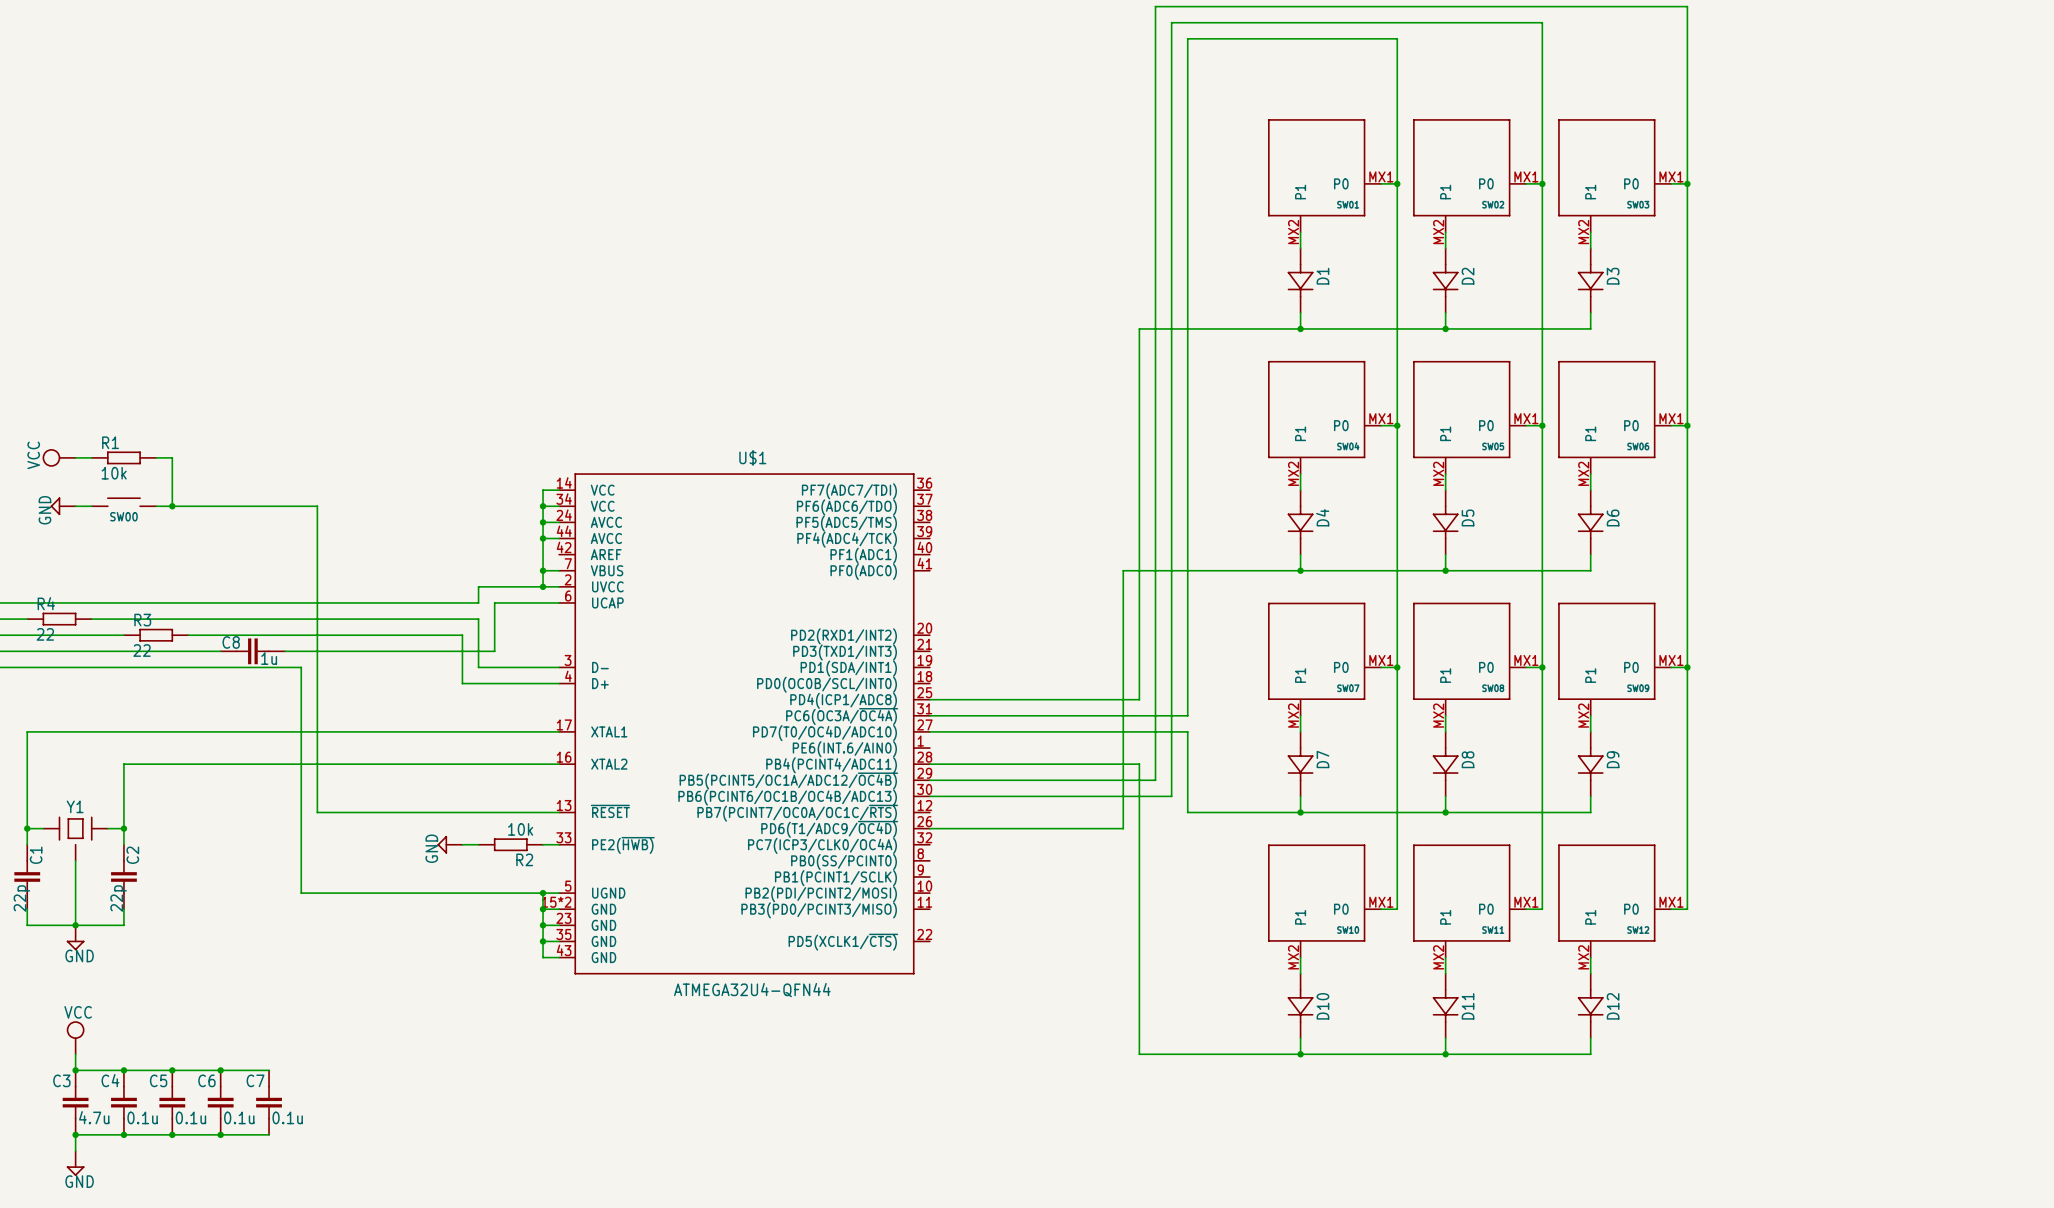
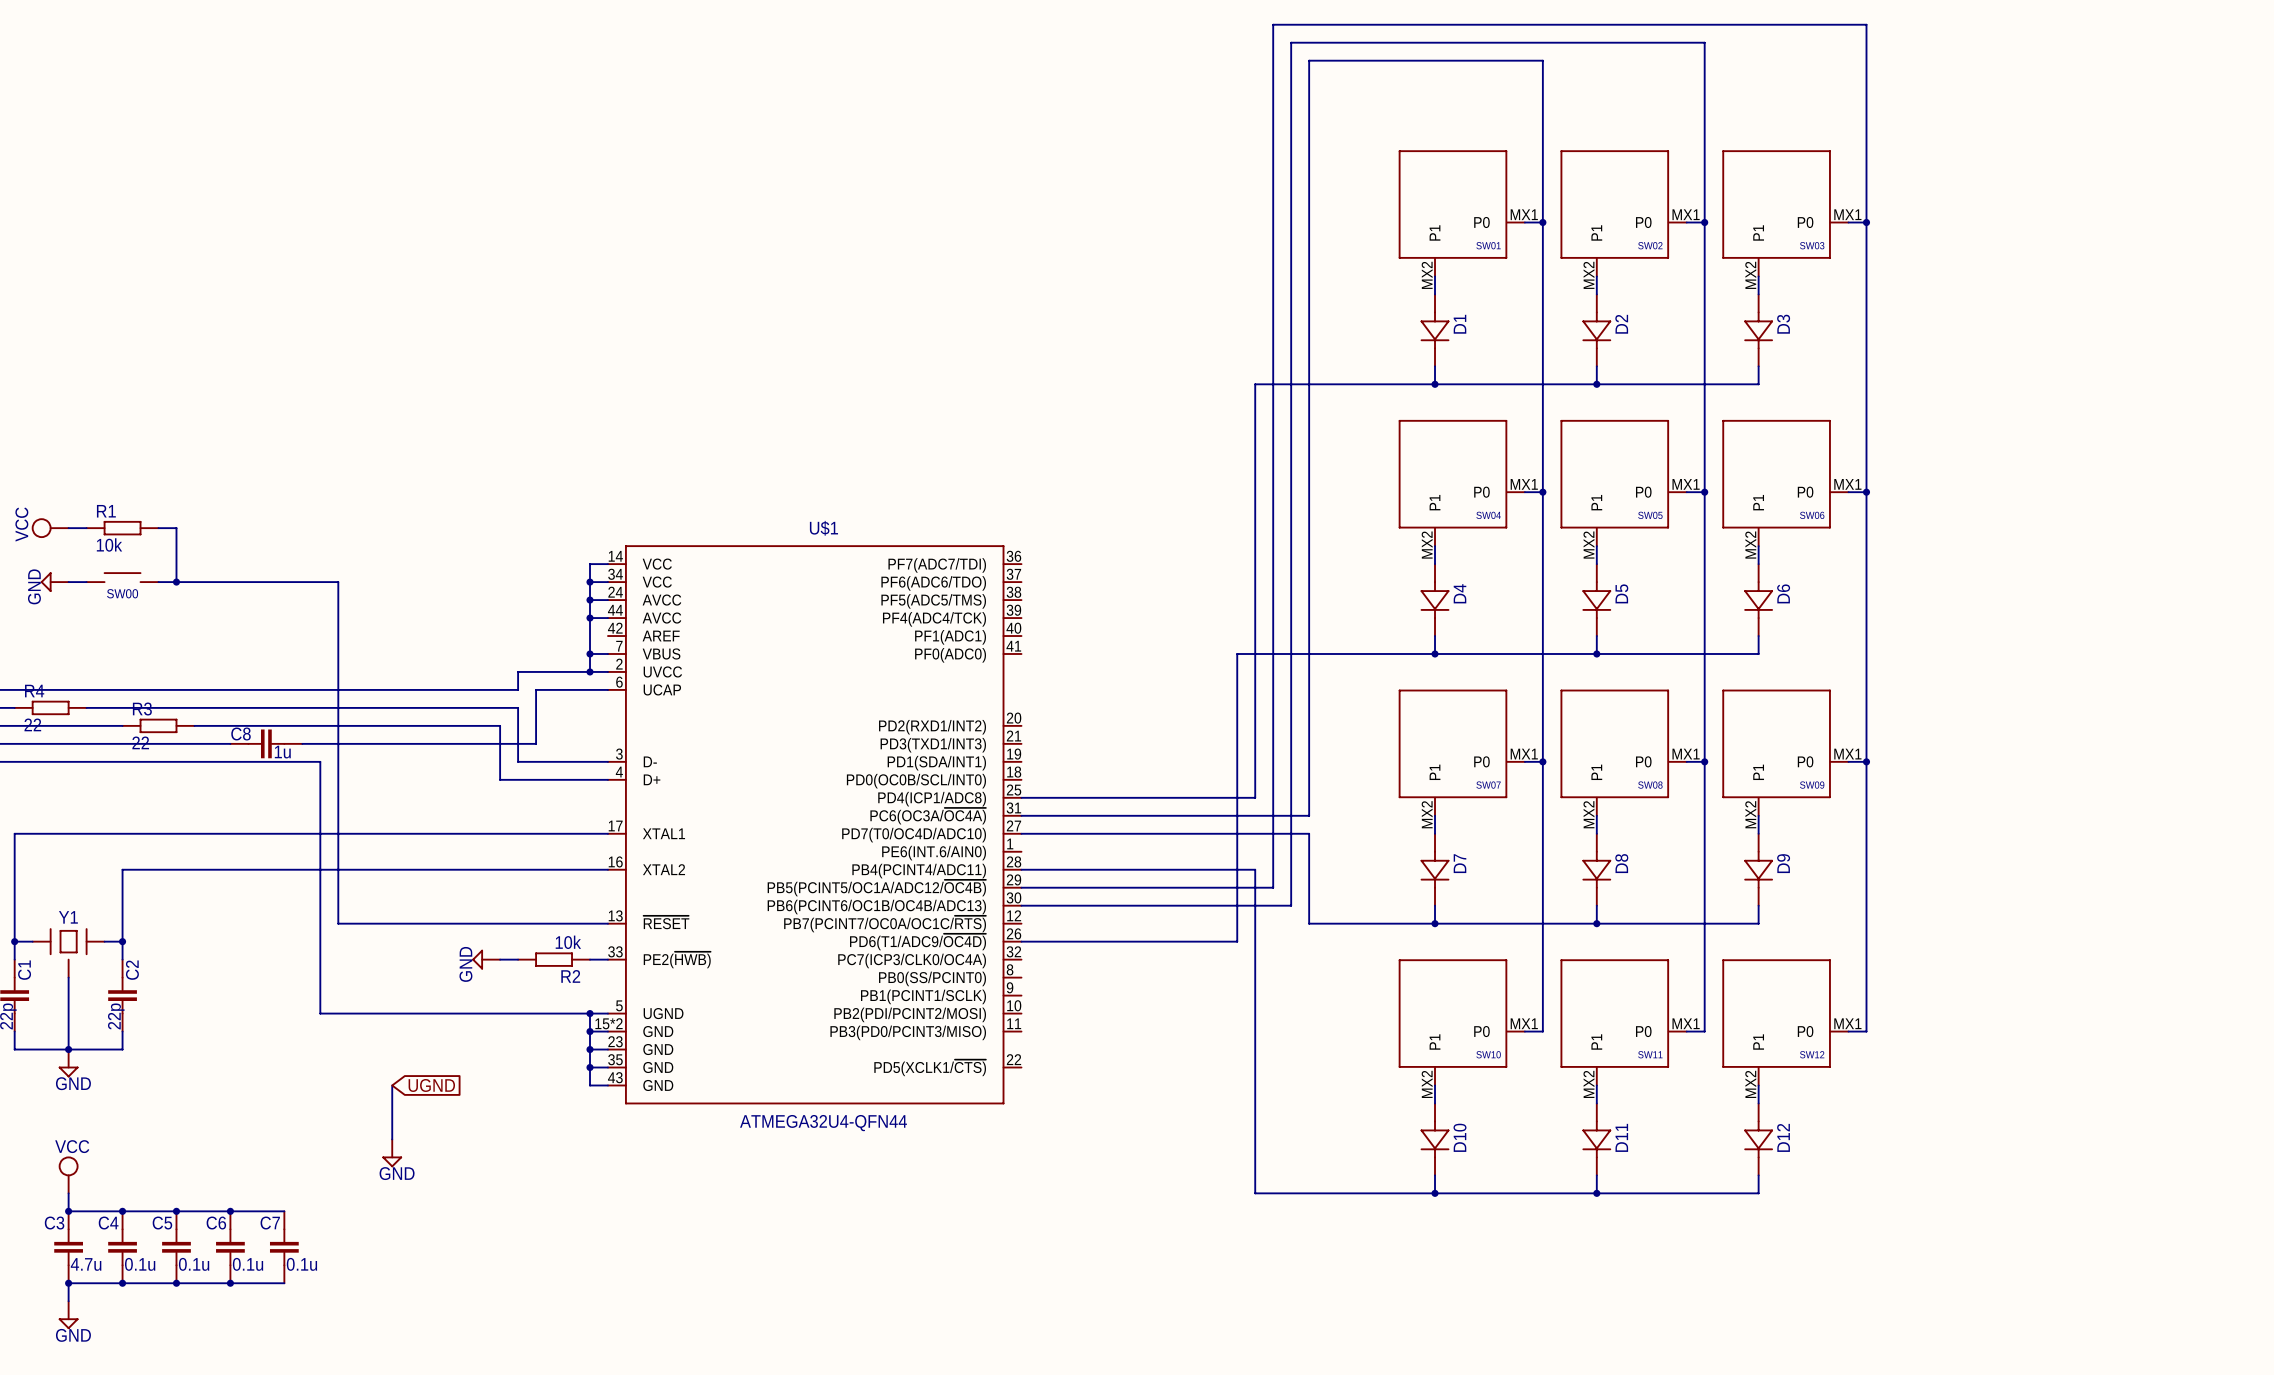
wire: none -> (392, 1085) (392, 1139)
global label: none -> UGND (431, 1085)
power symbol: none -> GND (392, 1153)

